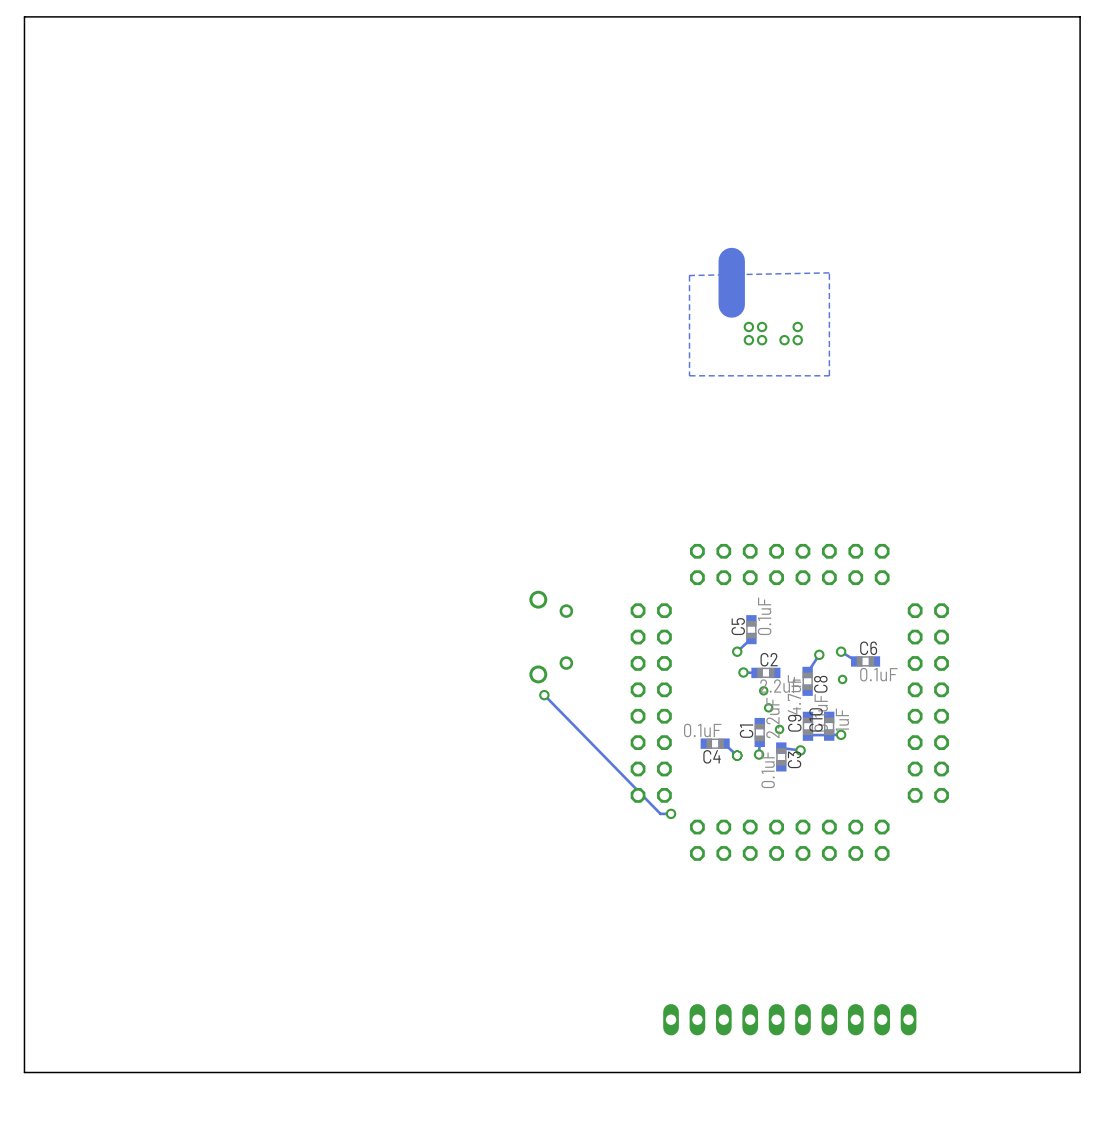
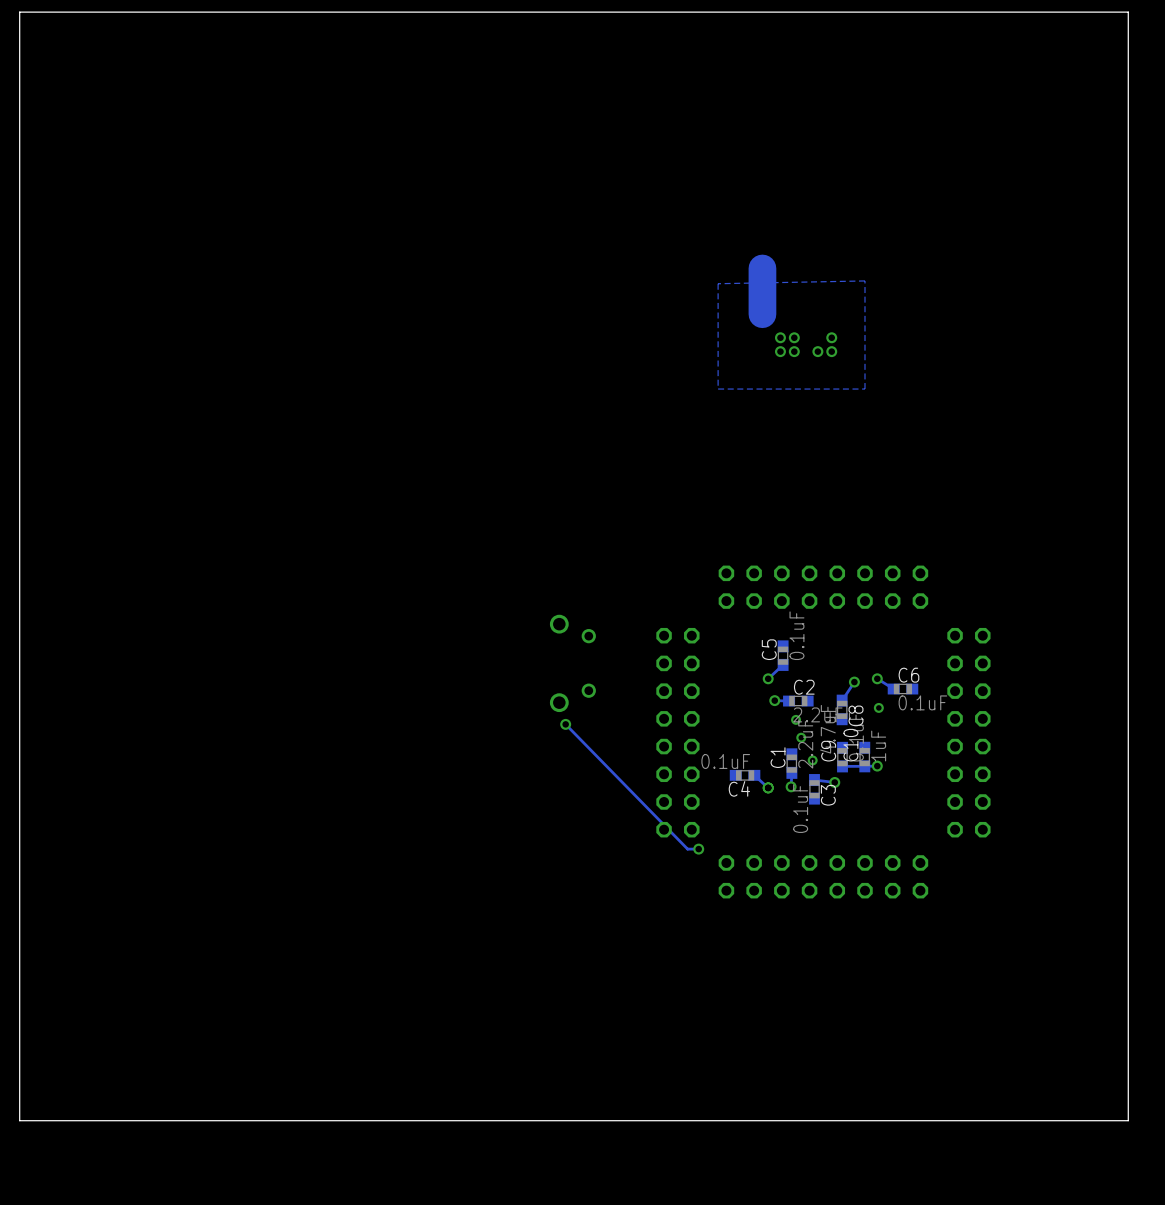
part: (789, 1019) -> none

